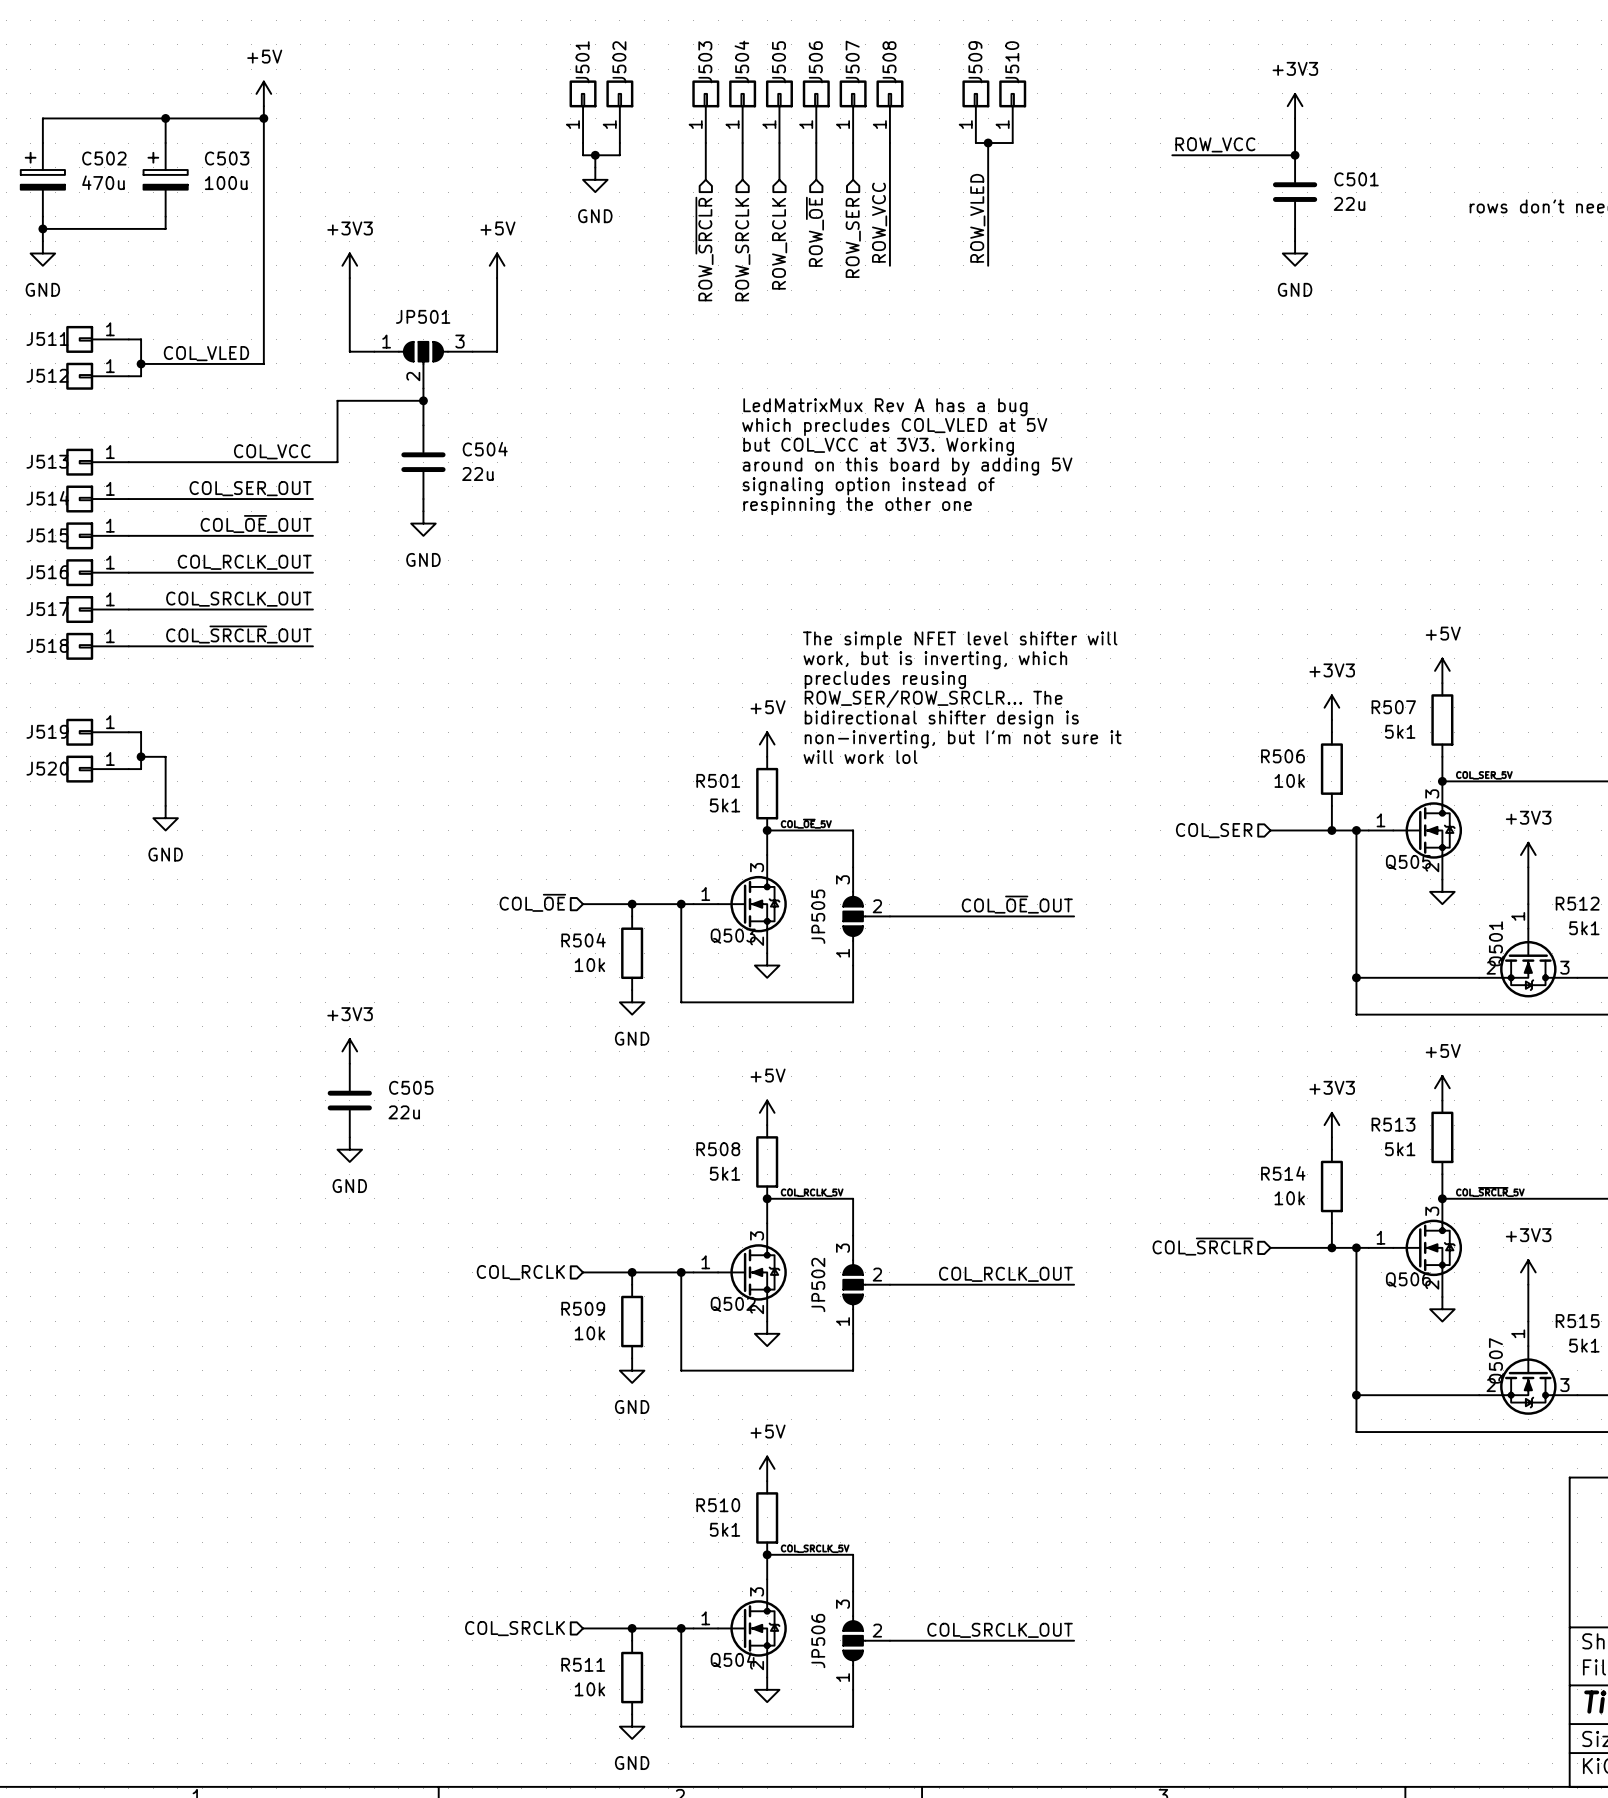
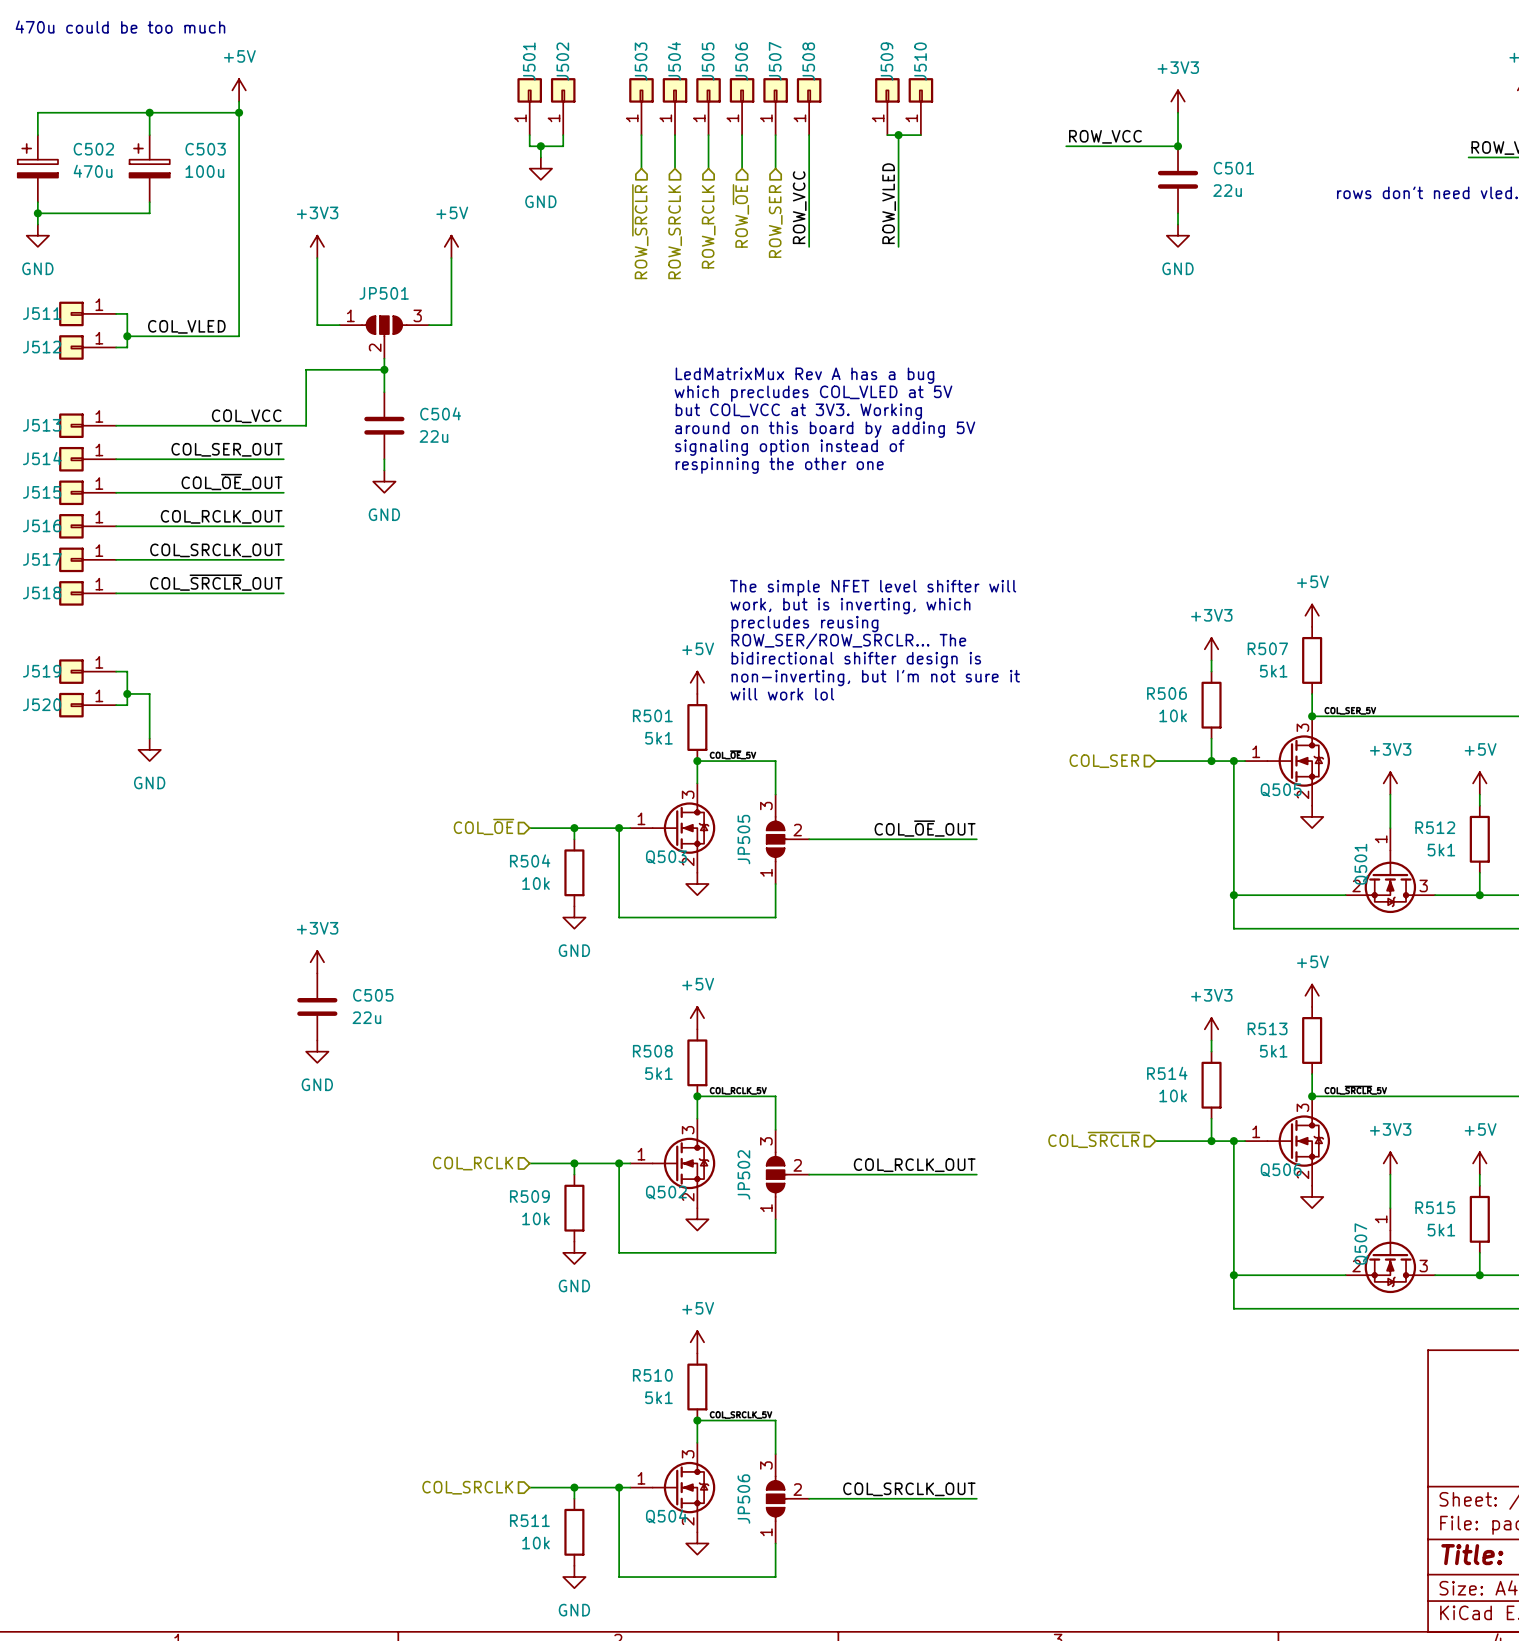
text: none -> 470u could be too much (120, 27)

